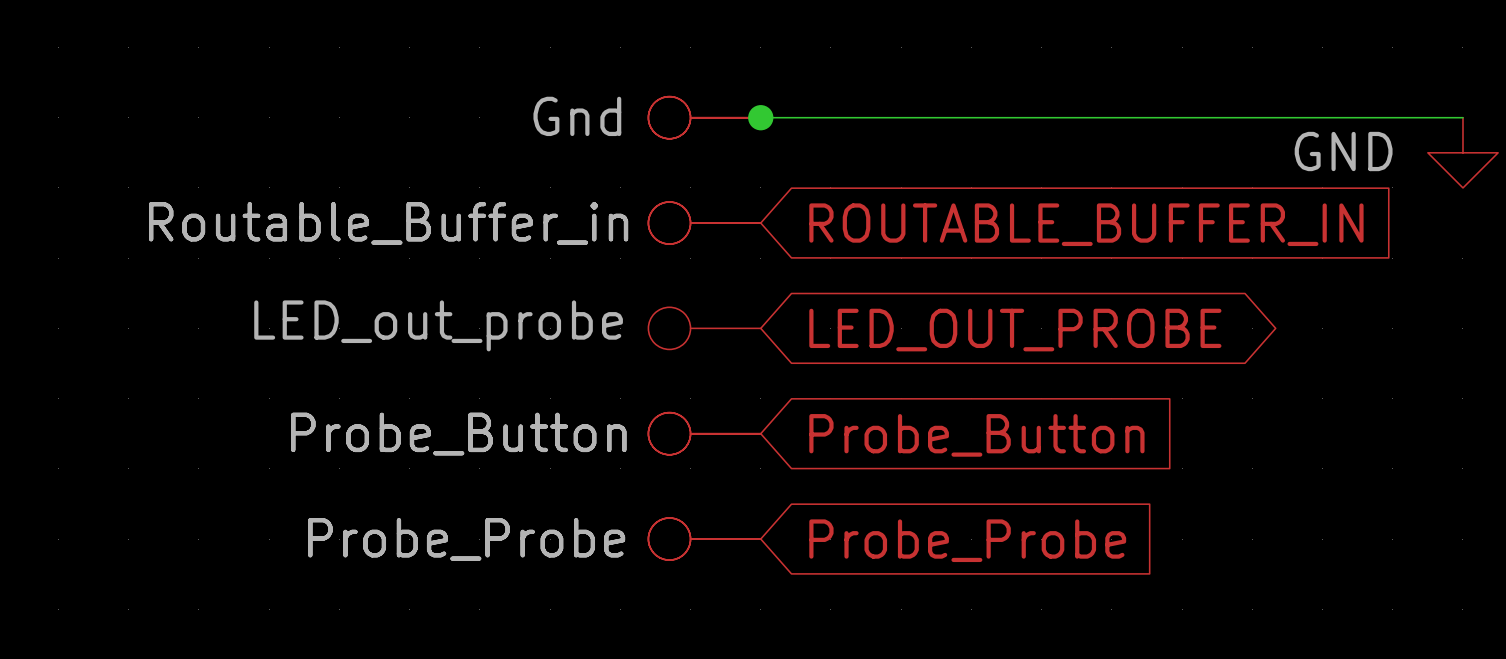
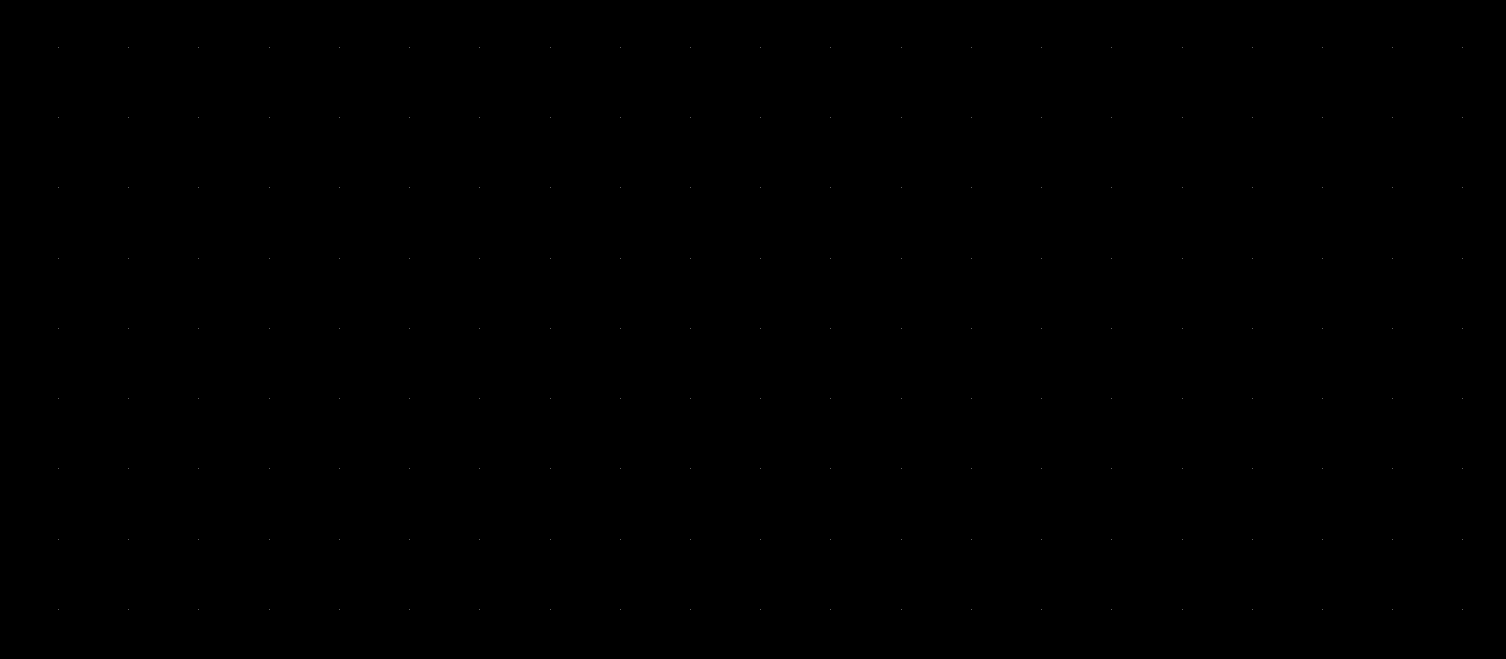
part: (704, 117) -> none
part: Gnd (704, 117) -> none
wire: (760, 117) (1462, 117) -> none
junction: (760, 117) -> none
power symbol: GND (1462, 152) -> none
part: Routable_Buffer_in (704, 223) -> none
global label: ROUTABLE_BUFFER_IN (1086, 224) -> none
part: LED_out_probe (704, 328) -> none
global label: LED_OUT_PROBE (1015, 330) -> none
part: Probe_Button (704, 433) -> none
global label: Probe_Button (976, 435) -> none
part: Probe_Probe (704, 539) -> none
global label: Probe_Probe (967, 540) -> none

